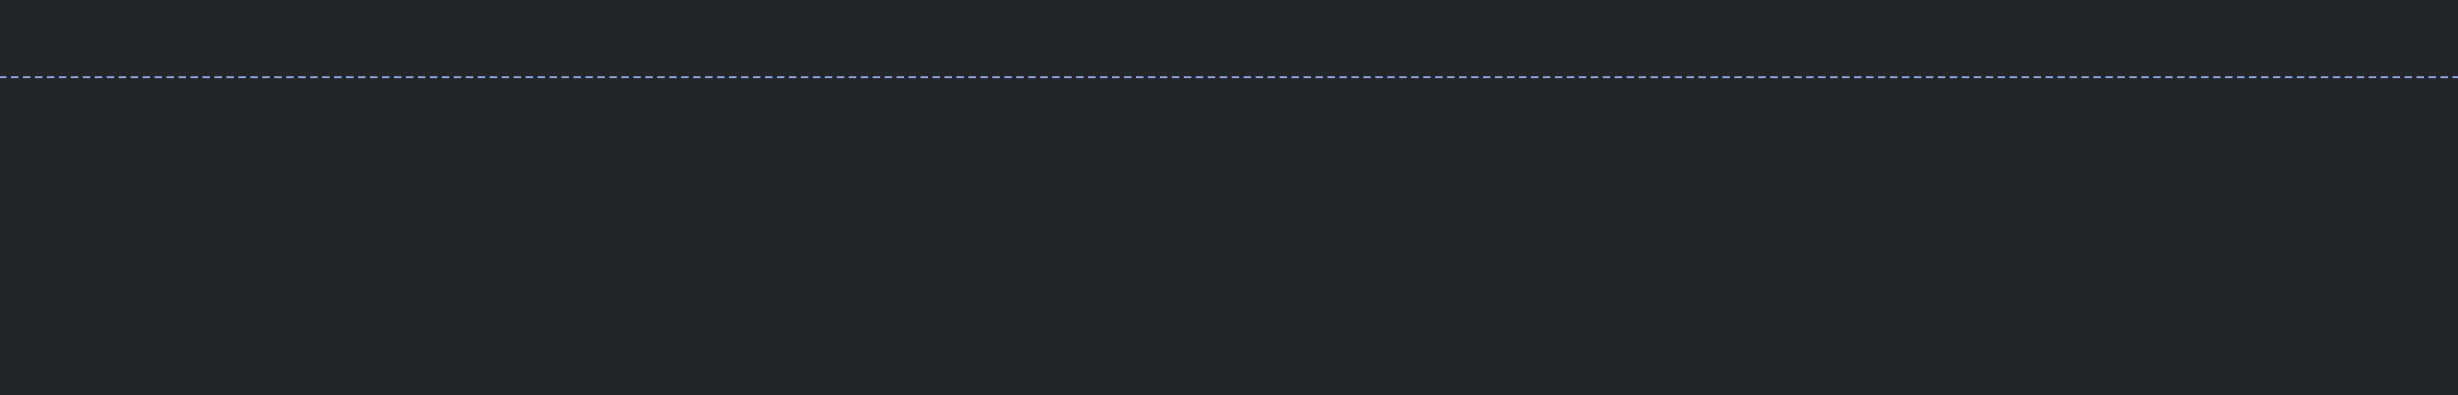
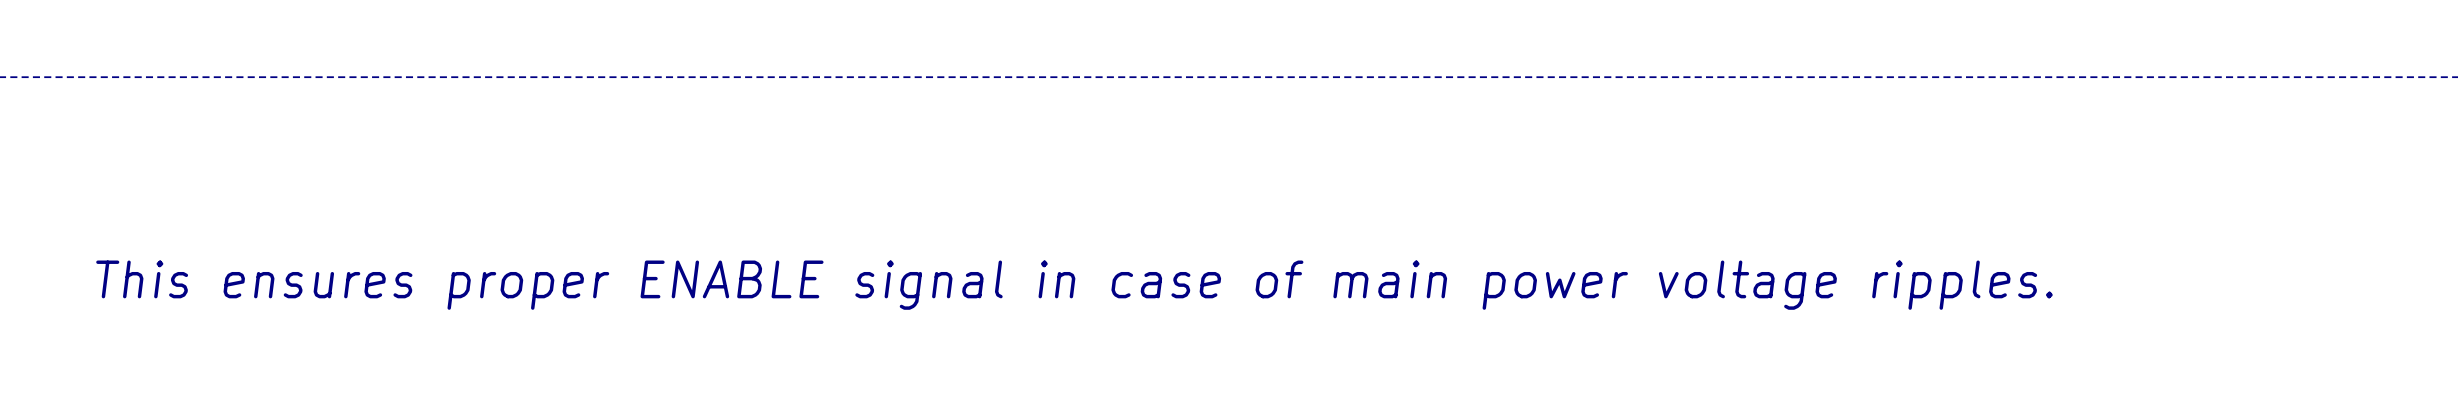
text: none -> This ensures proper ENABLE signal in case of main power voltage ripples. (1074, 285)

